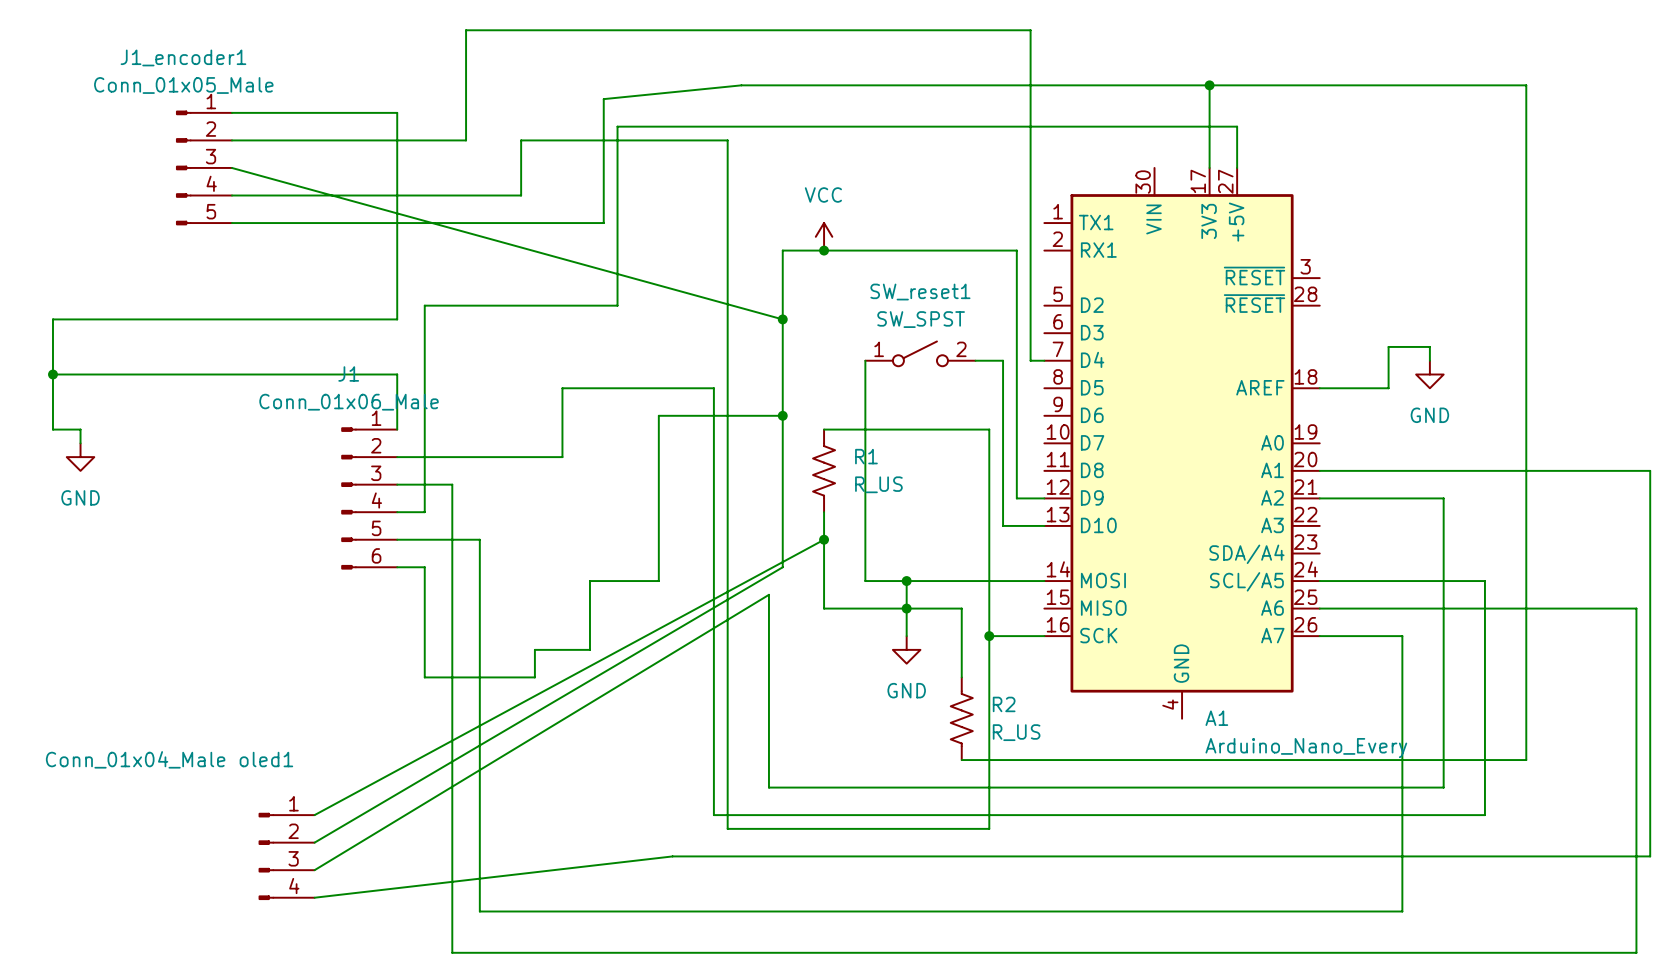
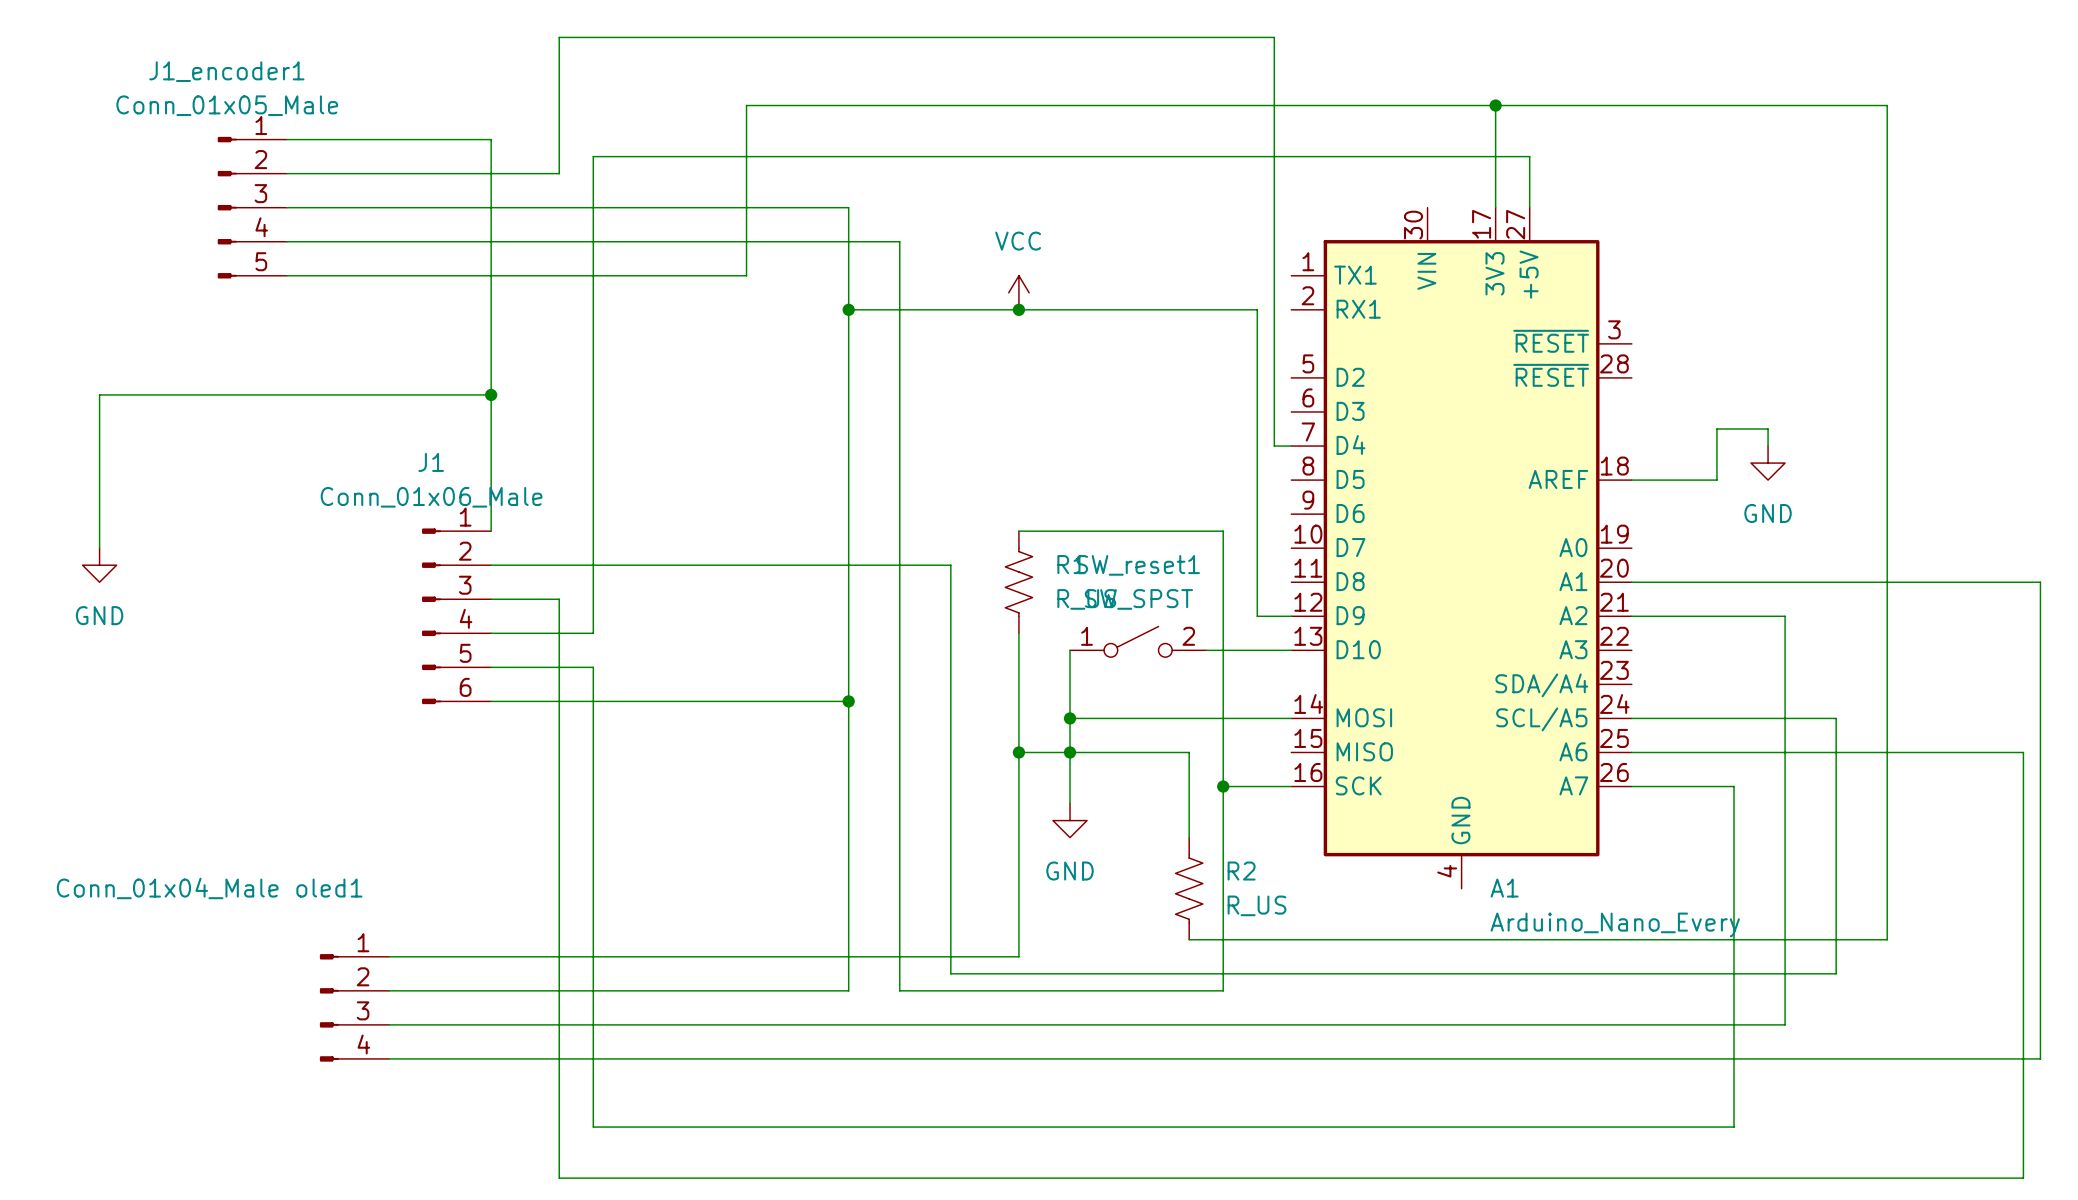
wire: (466, 30) (466, 140) (452, 140) -> (576, 37) (559, 37) (559, 173)
wire: (741, 85) (603, 99) -> (916, 105) (746, 105) (746, 122)
wire: (617, 126) (617, 305) (424, 305) (424, 512) -> (763, 156) (593, 156) (593, 633) (525, 633)
wire: (231, 167) (782, 319) -> (286, 207) (848, 207) (848, 990) (389, 990)
wire: (521, 195) (521, 140) (727, 140) (727, 195) -> (644, 241) (899, 241)
junction: none -> (848, 309)
wire: (782, 250) (782, 567) (314, 842) -> (967, 309) (848, 309)
wire: (80, 319) (52, 319) (52, 429) (80, 429) -> (99, 394) (99, 531)
junction: none -> (491, 394)
junction: (782, 319) -> none
SW_reset1 position: (920, 353) -> (1138, 641)
wire: (865, 360) (865, 525) -> none
wire: (975, 360) (1003, 360) (1003, 525) -> (1206, 650) (1240, 650)
wire: (52, 374) (397, 374) -> (491, 394) (491, 463)
junction: (52, 374) -> none
wire: (782, 415) (658, 415) (658, 581) (589, 581) (589, 649) (534, 649) (534, 677) (424, 677) (424, 567) -> (848, 701) (525, 701)
junction: (782, 415) -> none
wire: (562, 457) (562, 388) (713, 388) (713, 815) (1484, 815) (1484, 787) -> none
wire: (824, 539) (314, 815) -> none
junction: (824, 539) -> none
junction: none -> (848, 701)
wire: none -> (1070, 718) (1070, 803)
junction: none -> (1070, 718)
wire: (906, 581) (906, 636) -> none
junction: (906, 581) -> none
wire: (768, 594) (314, 870) -> (950, 735) (950, 565) (695, 565)
wire: none -> (1018, 752) (1018, 956) (389, 956)
junction: none -> (1018, 752)
junction: none -> (1070, 752)
junction: (906, 608) -> none
power symbol position: GND (906, 649) -> GND (1070, 820)
wire: (727, 801) (727, 828) -> (899, 990) (1223, 990)
wire: (989, 801) (989, 828) -> (1836, 973) (1785, 973) (1785, 1024) (1223, 1024)
wire: none -> (389, 1024) (899, 1024)
oled1 position: (286, 856) -> (354, 1007)
wire: (672, 856) (314, 897) -> (831, 1058) (389, 1058)

